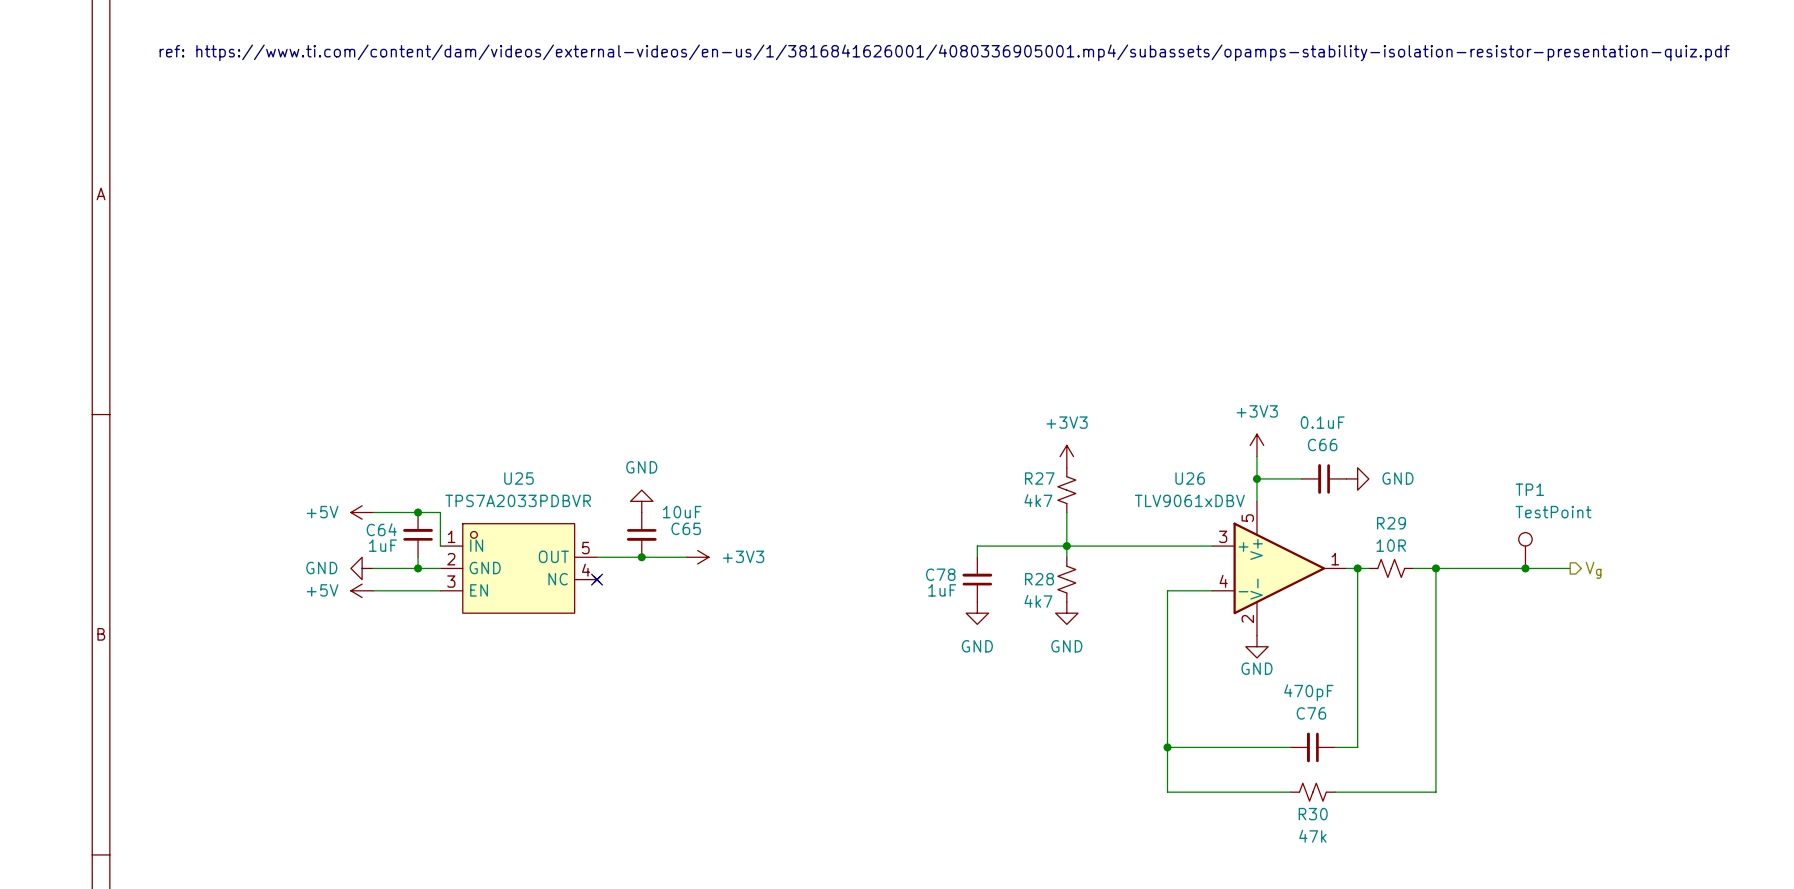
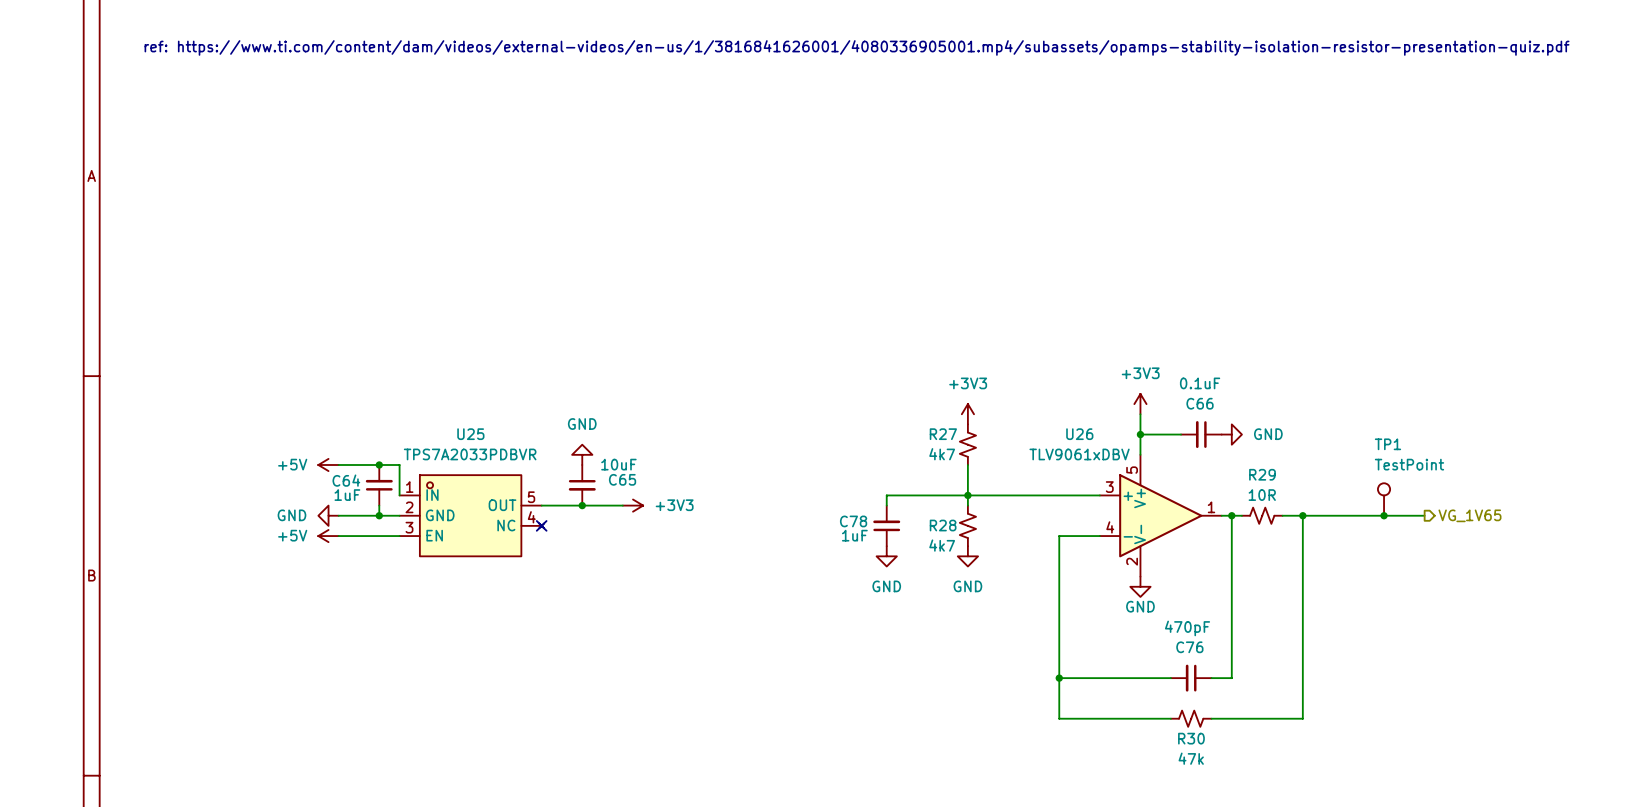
hierarchical label: Vg (1593, 570) -> VG_1V65 (1469, 515)

